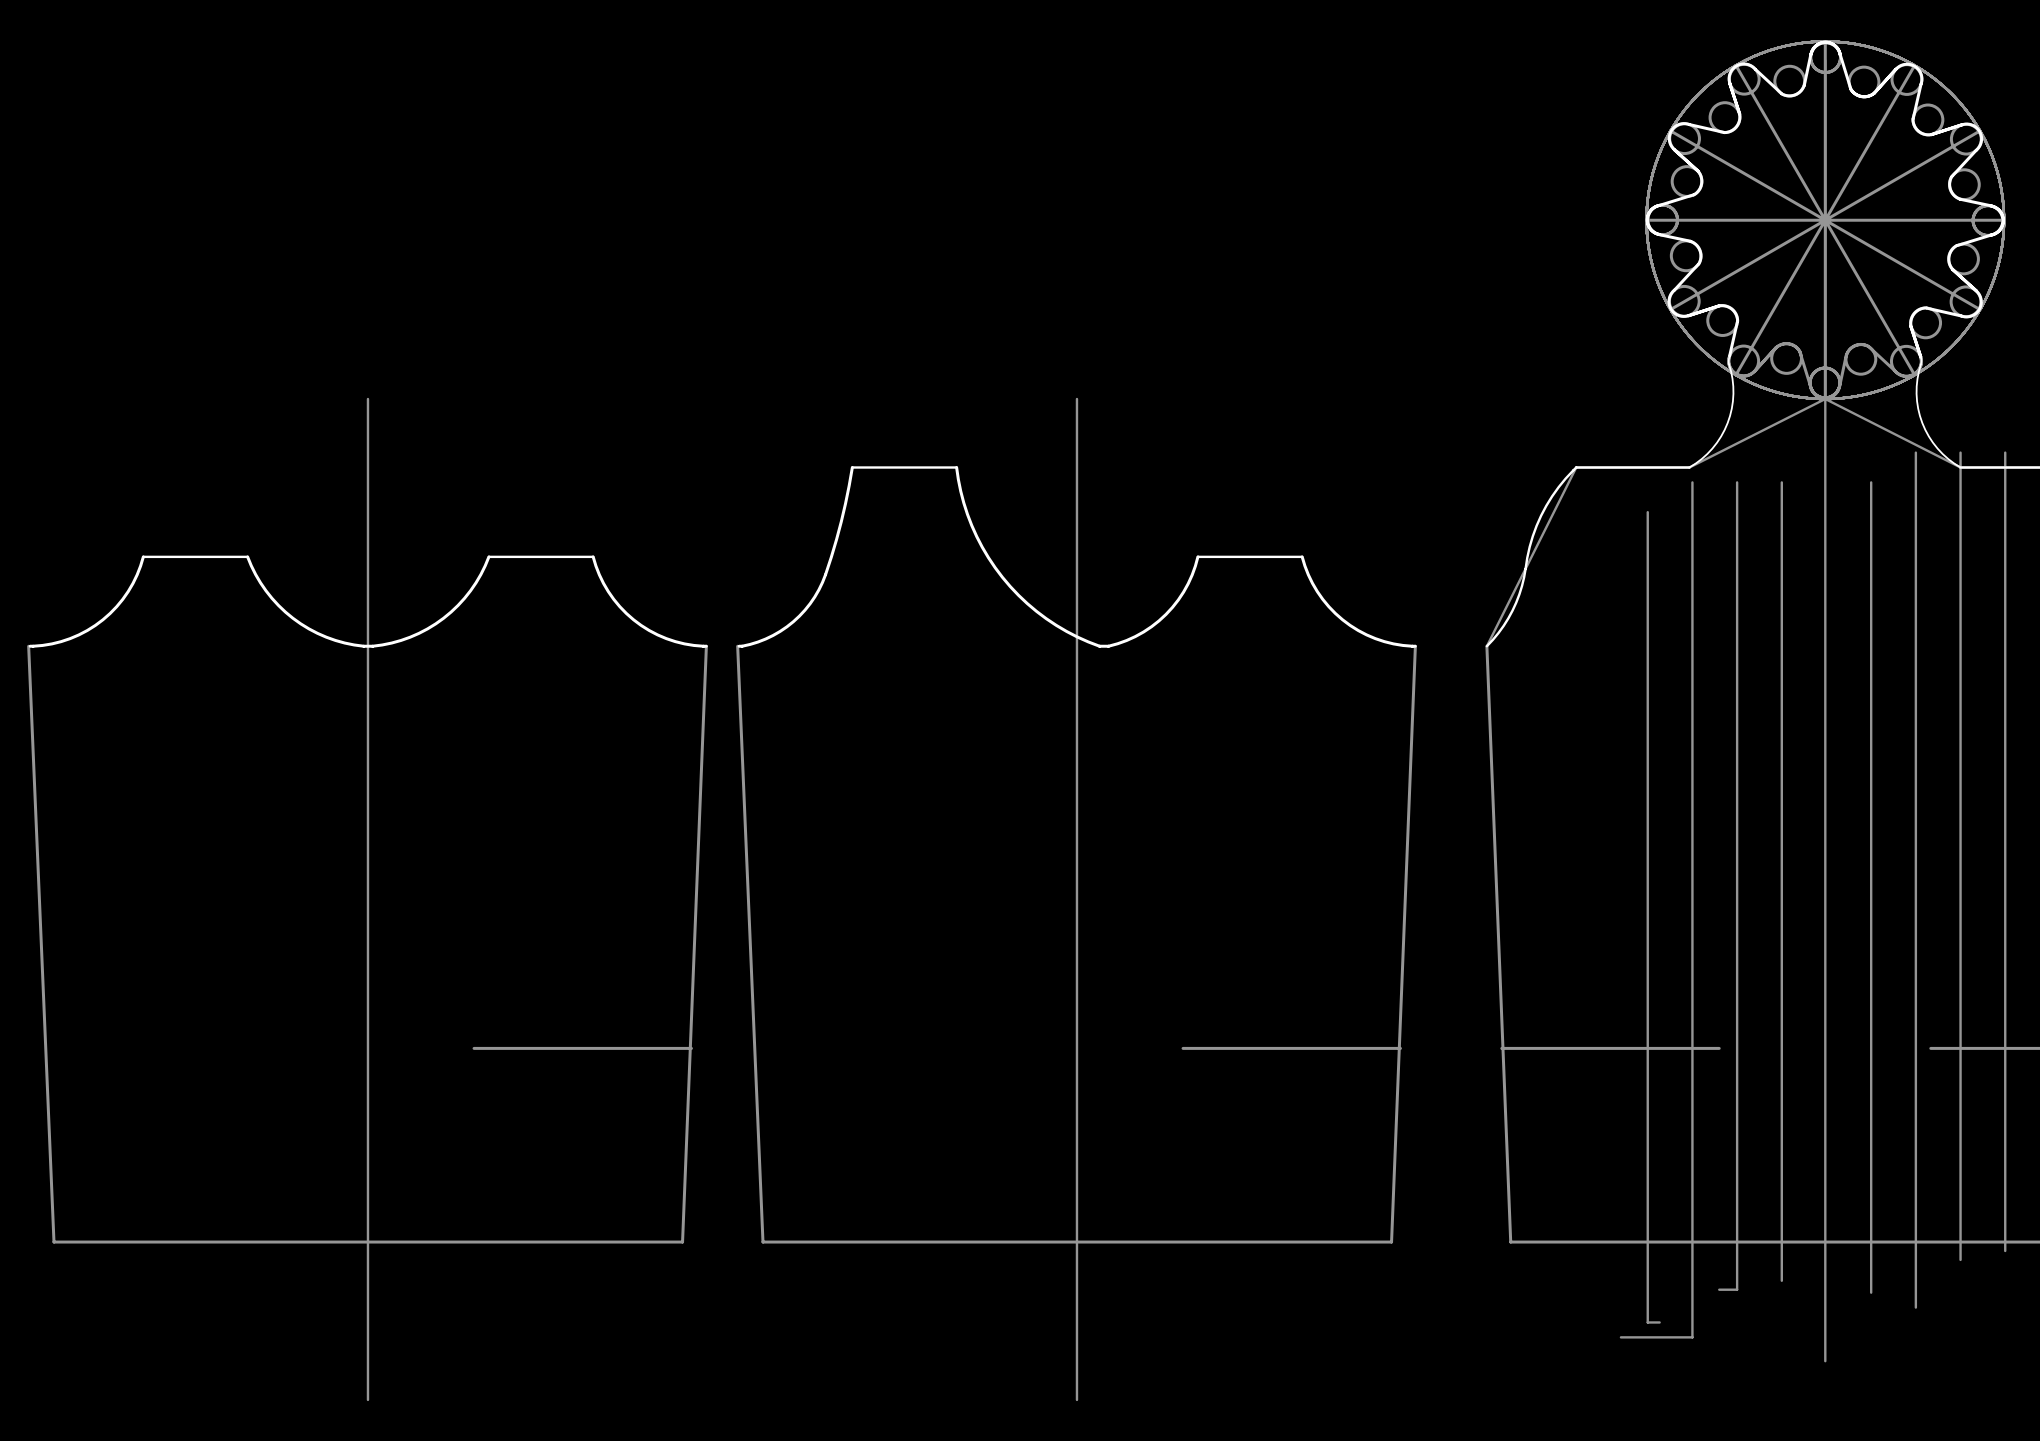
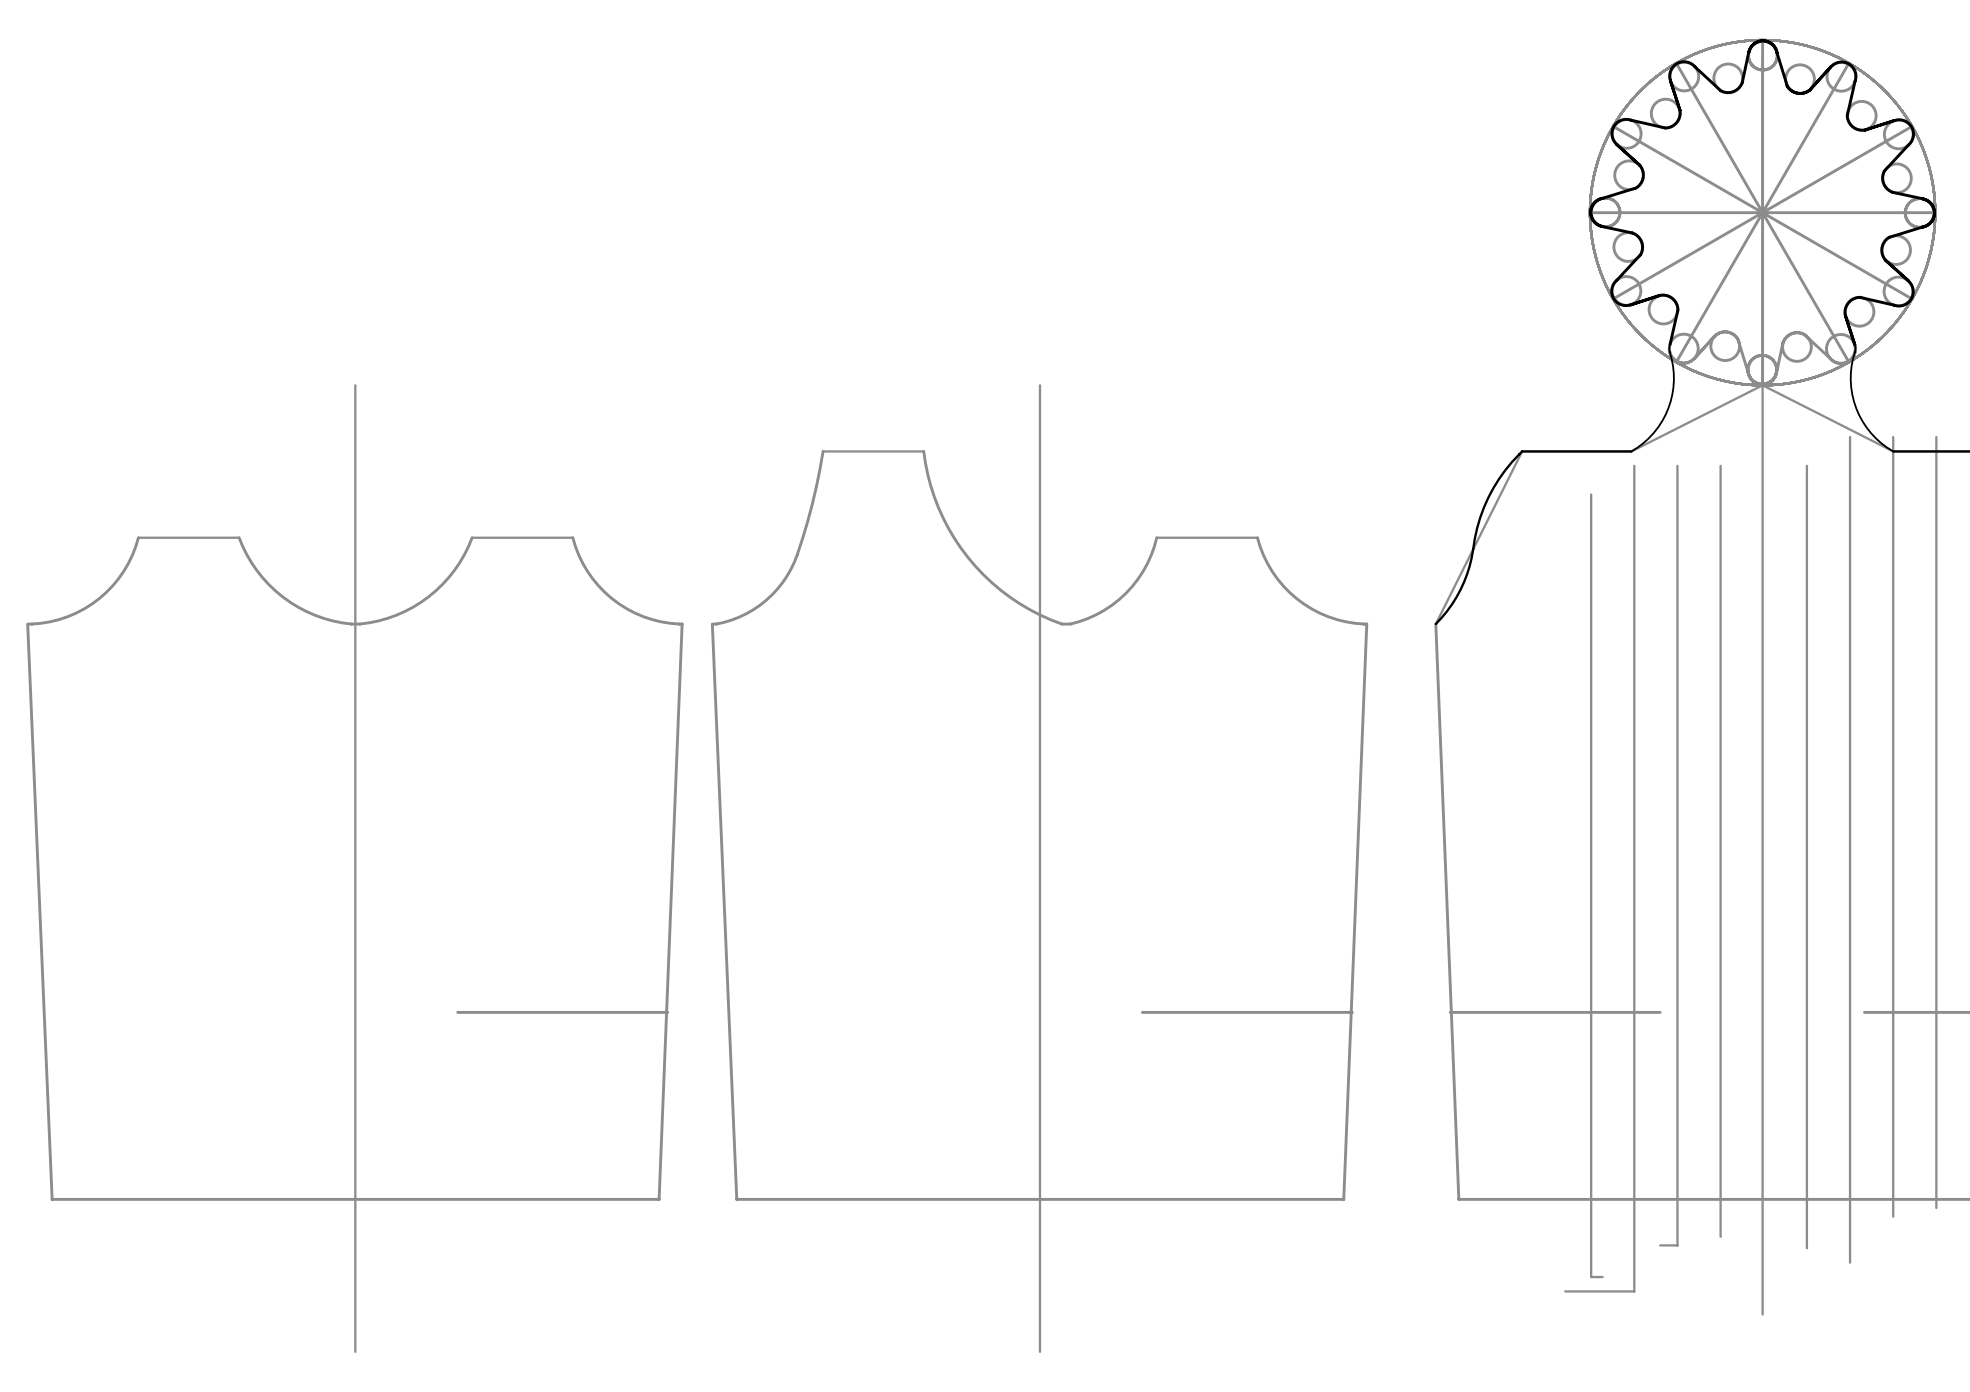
line: none -> (29, 624) (50, 621) (67, 616) (99, 598) (123, 571) (138, 537) (239, 537) (256, 570) (282, 596) (315, 615) (351, 624) (369, 622) (387, 618) (420, 602) (435, 591) (454, 570) (472, 537) (572, 537) (587, 571) (611, 598) (643, 616) (661, 621) (682, 624)
board edge: (30, 646) (51, 643) (70, 638) (87, 630) (102, 619) (116, 606) (128, 591) (137, 574) (143, 556) (247, 556) (265, 590) (292, 618) (326, 637) (363, 646) (382, 644) (401, 640) (435, 623) (451, 612) (470, 590) (488, 556) (593, 556) (599, 574) (608, 591) (619, 606) (633, 619) (649, 630) (666, 638) (684, 643) (706, 646) -> none
line: none -> (713, 624) (731, 619) (753, 609) (771, 594) (786, 576) (797, 555) (807, 521) (823, 451) (923, 451) (927, 474) (938, 507) (948, 528) (968, 557) (992, 582) (1010, 597) (1040, 615) (1061, 624) (1070, 624) (1087, 618) (1119, 599) (1142, 571) (1156, 537) (1257, 537) (1272, 571) (1296, 598) (1328, 616) (1345, 621) (1366, 624)
board edge: (739, 646) (758, 642) (780, 631) (799, 616) (814, 596) (825, 574) (836, 539) (852, 467) (956, 467) (960, 491) (971, 525) (982, 547) (1002, 577) (1027, 603) (1046, 618) (1077, 637) (1099, 646) (1108, 646) (1126, 640) (1143, 631) (1159, 620) (1172, 607) (1183, 591) (1192, 574) (1197, 556) (1302, 556) (1308, 574) (1317, 591) (1328, 606) (1342, 619) (1358, 630) (1375, 638) (1393, 643) (1415, 646) -> none

